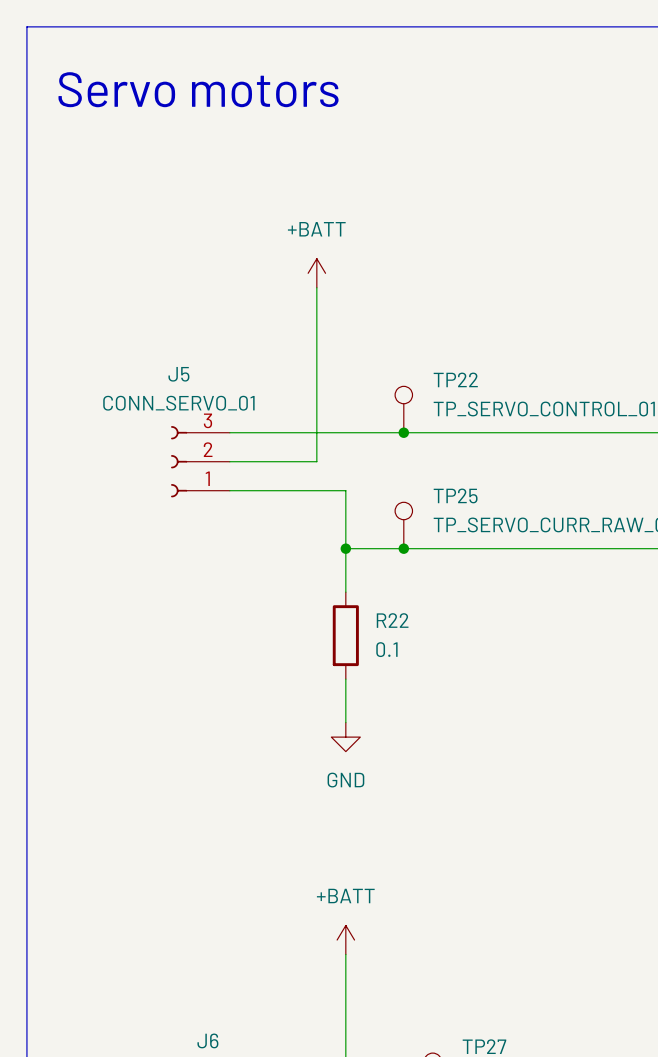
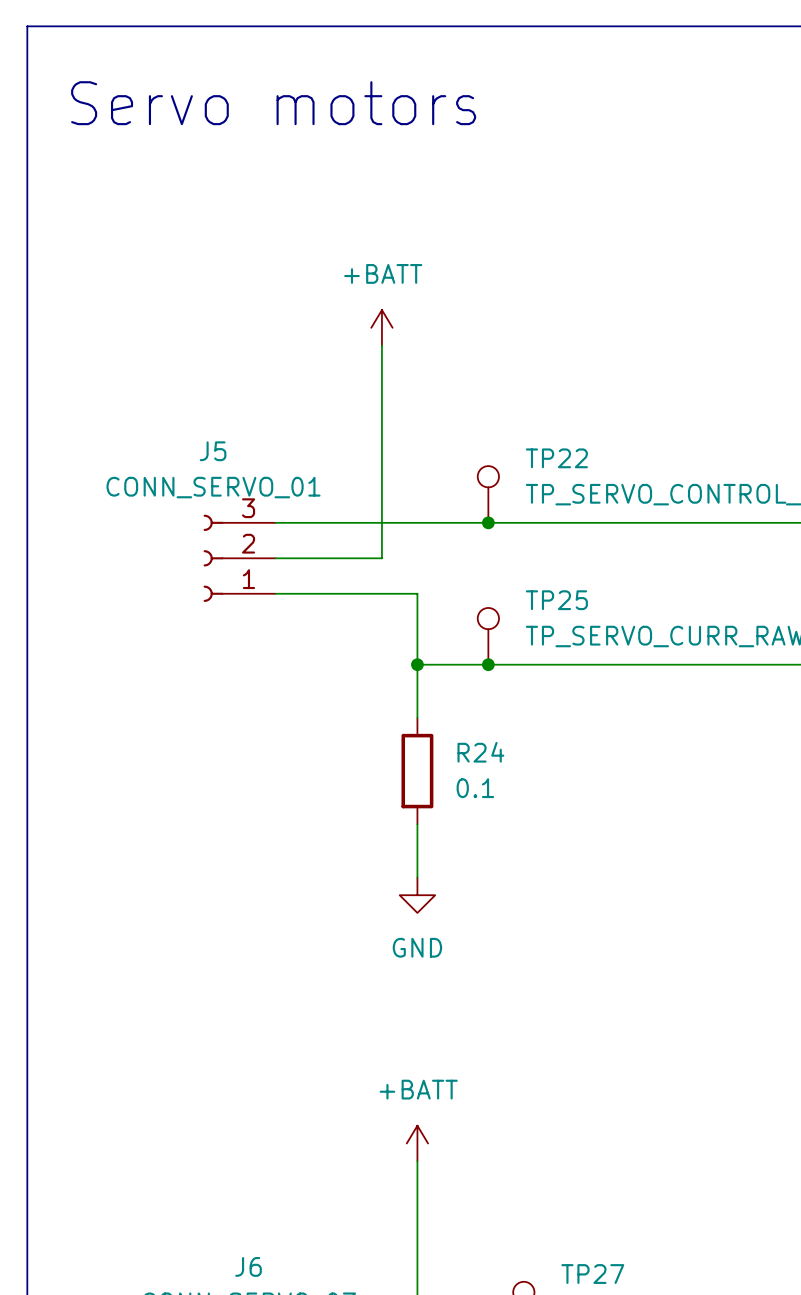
R22 name: R22 (392, 620) -> R24 (480, 752)

